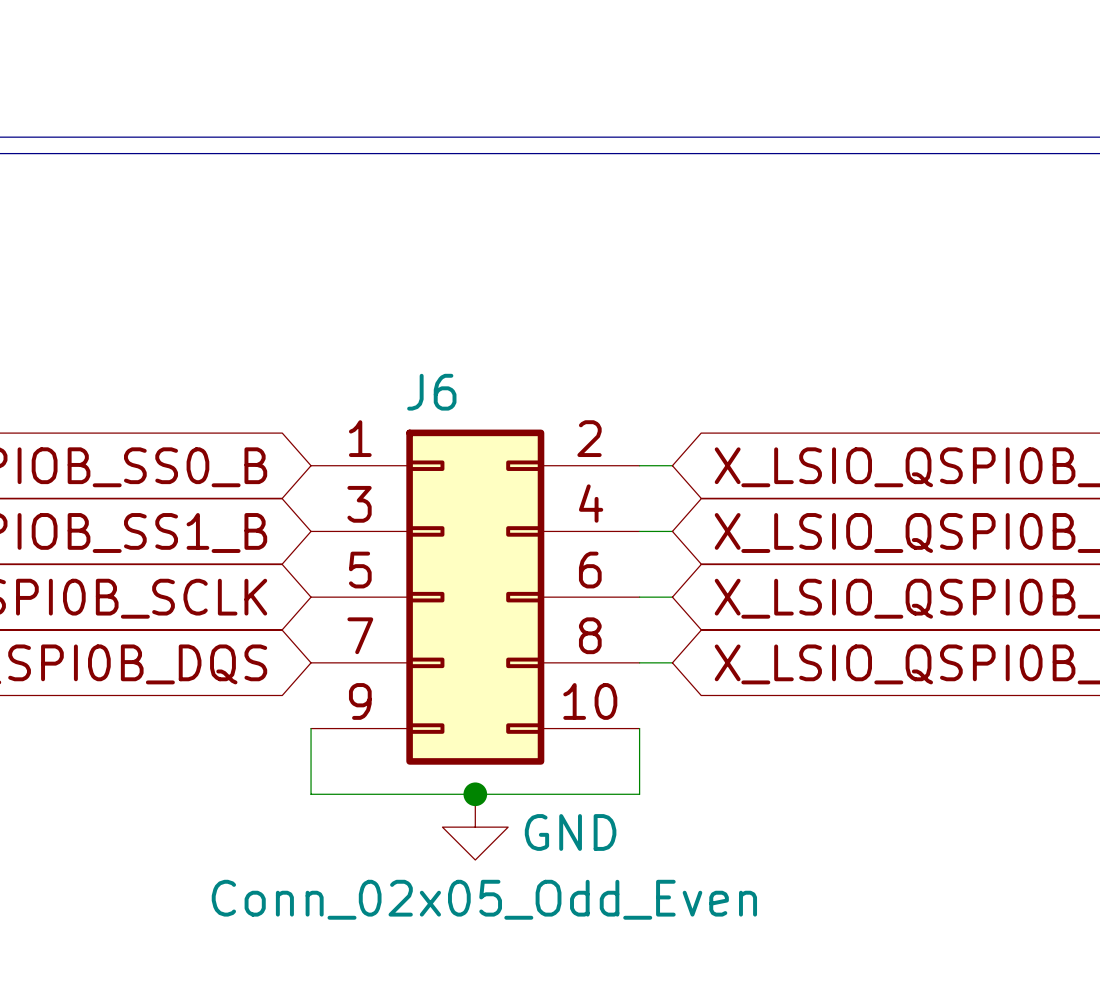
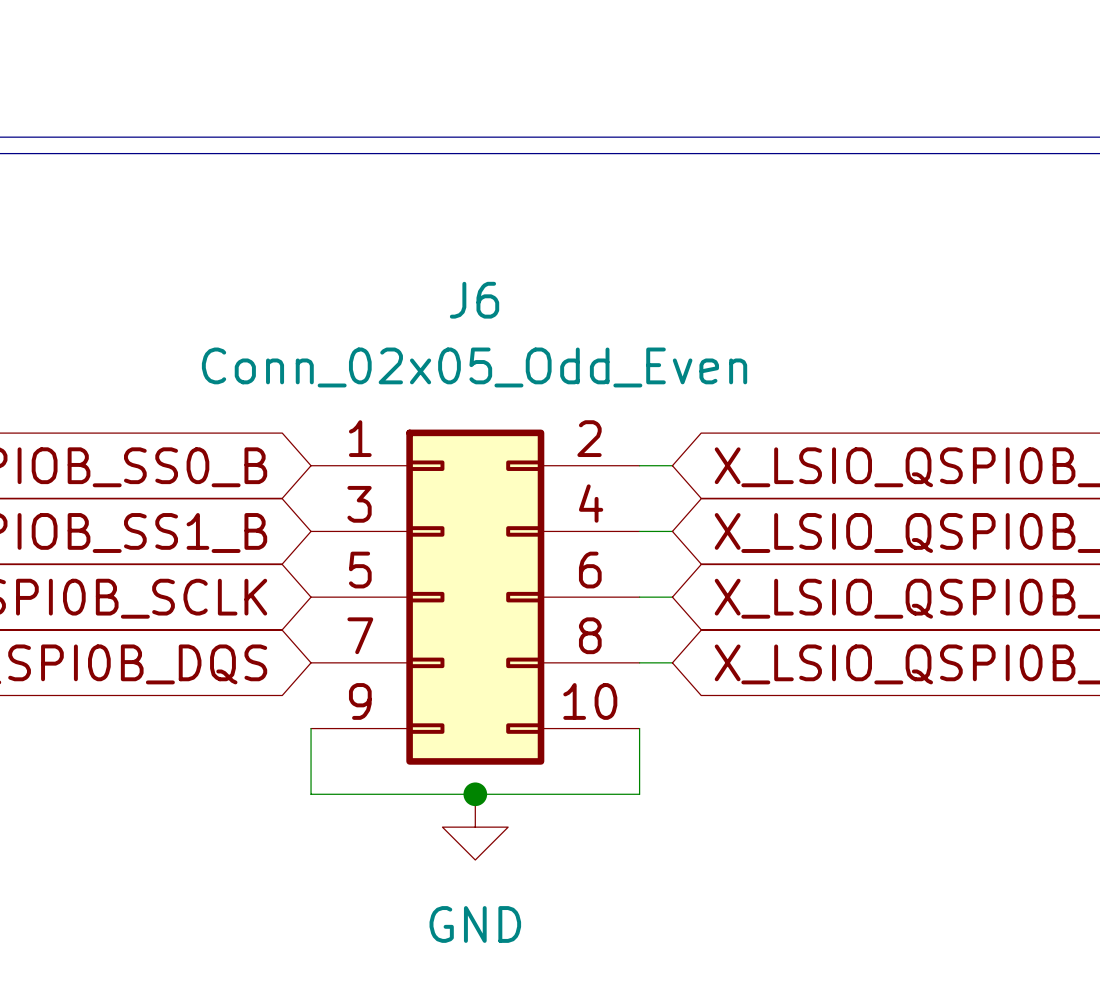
J6 name position: J6 (431, 392) -> J6 (474, 300)
power symbol text position: GND (570, 832) -> GND (475, 924)
J6 value position: Conn_02x05_Odd_Even (484, 899) -> Conn_02x05_Odd_Even (474, 367)

